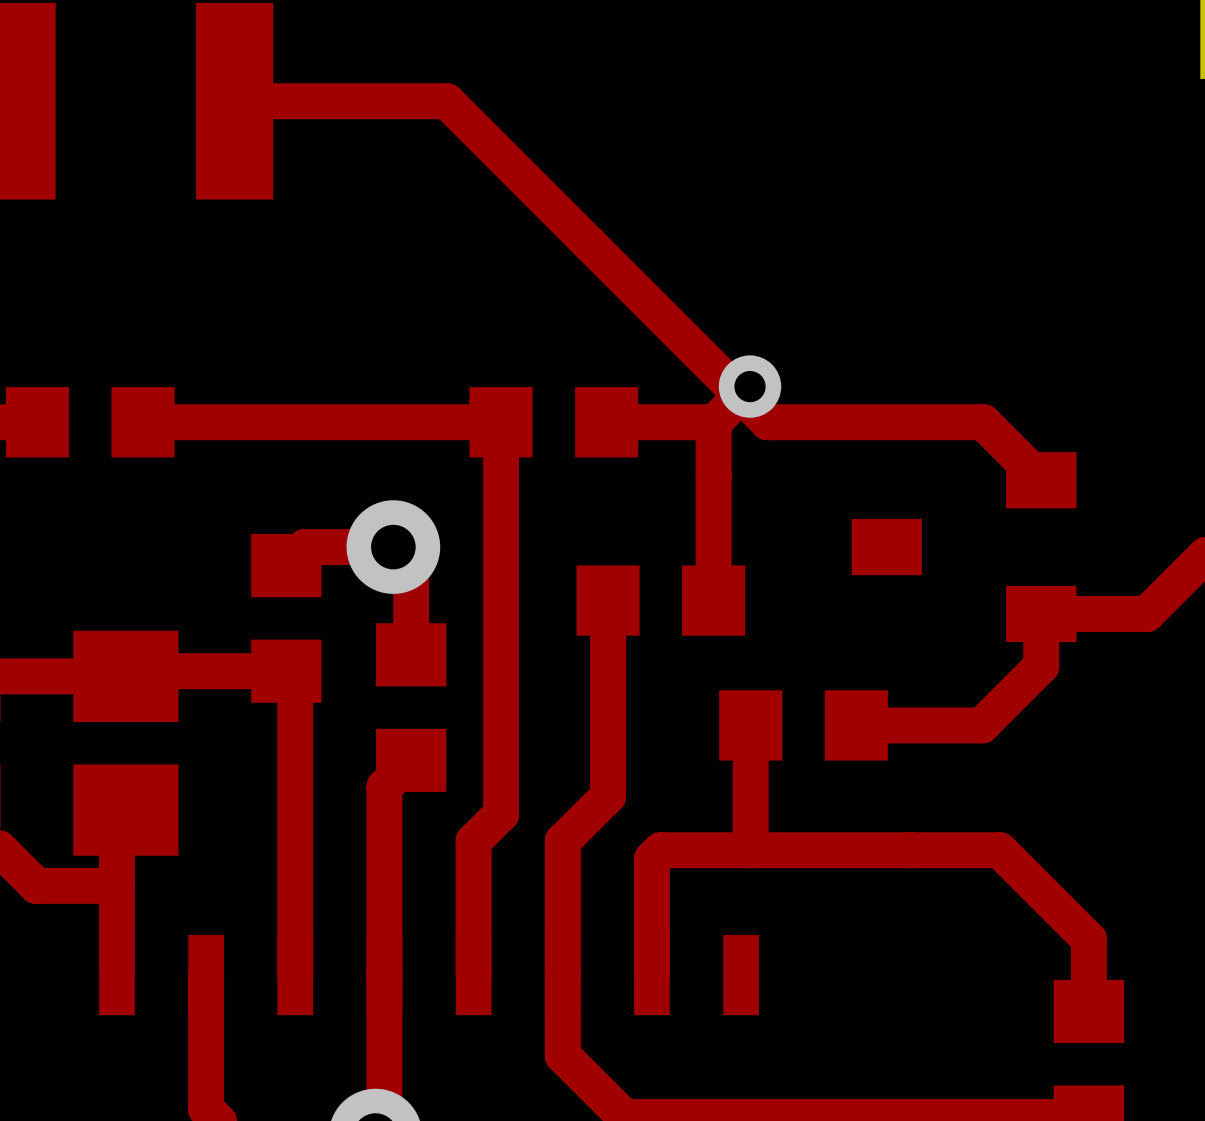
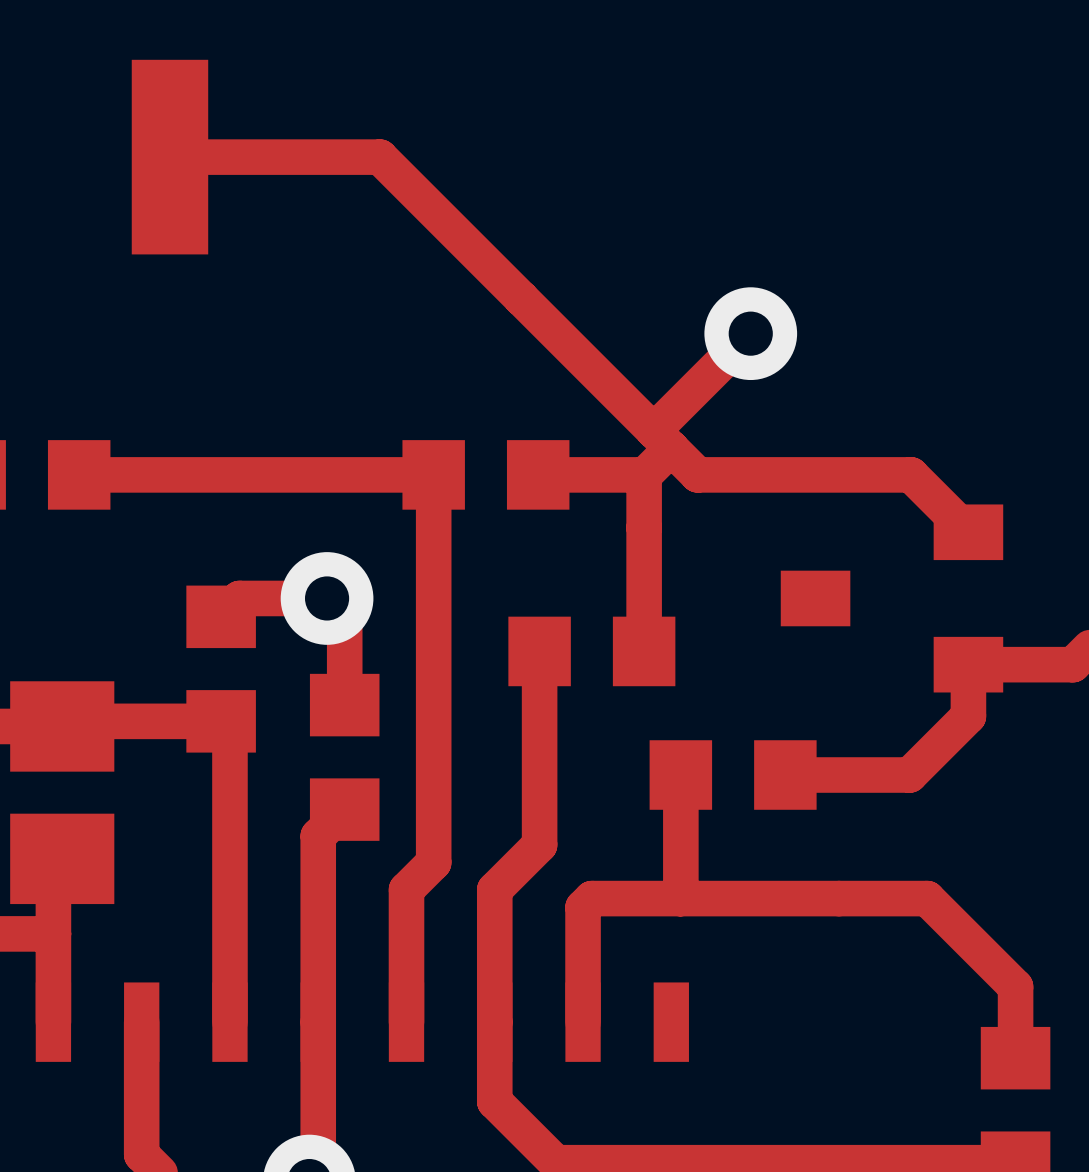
top track: none -> (750, 333) (653, 430)
via: none -> (750, 333)
via: (750, 386) -> none

